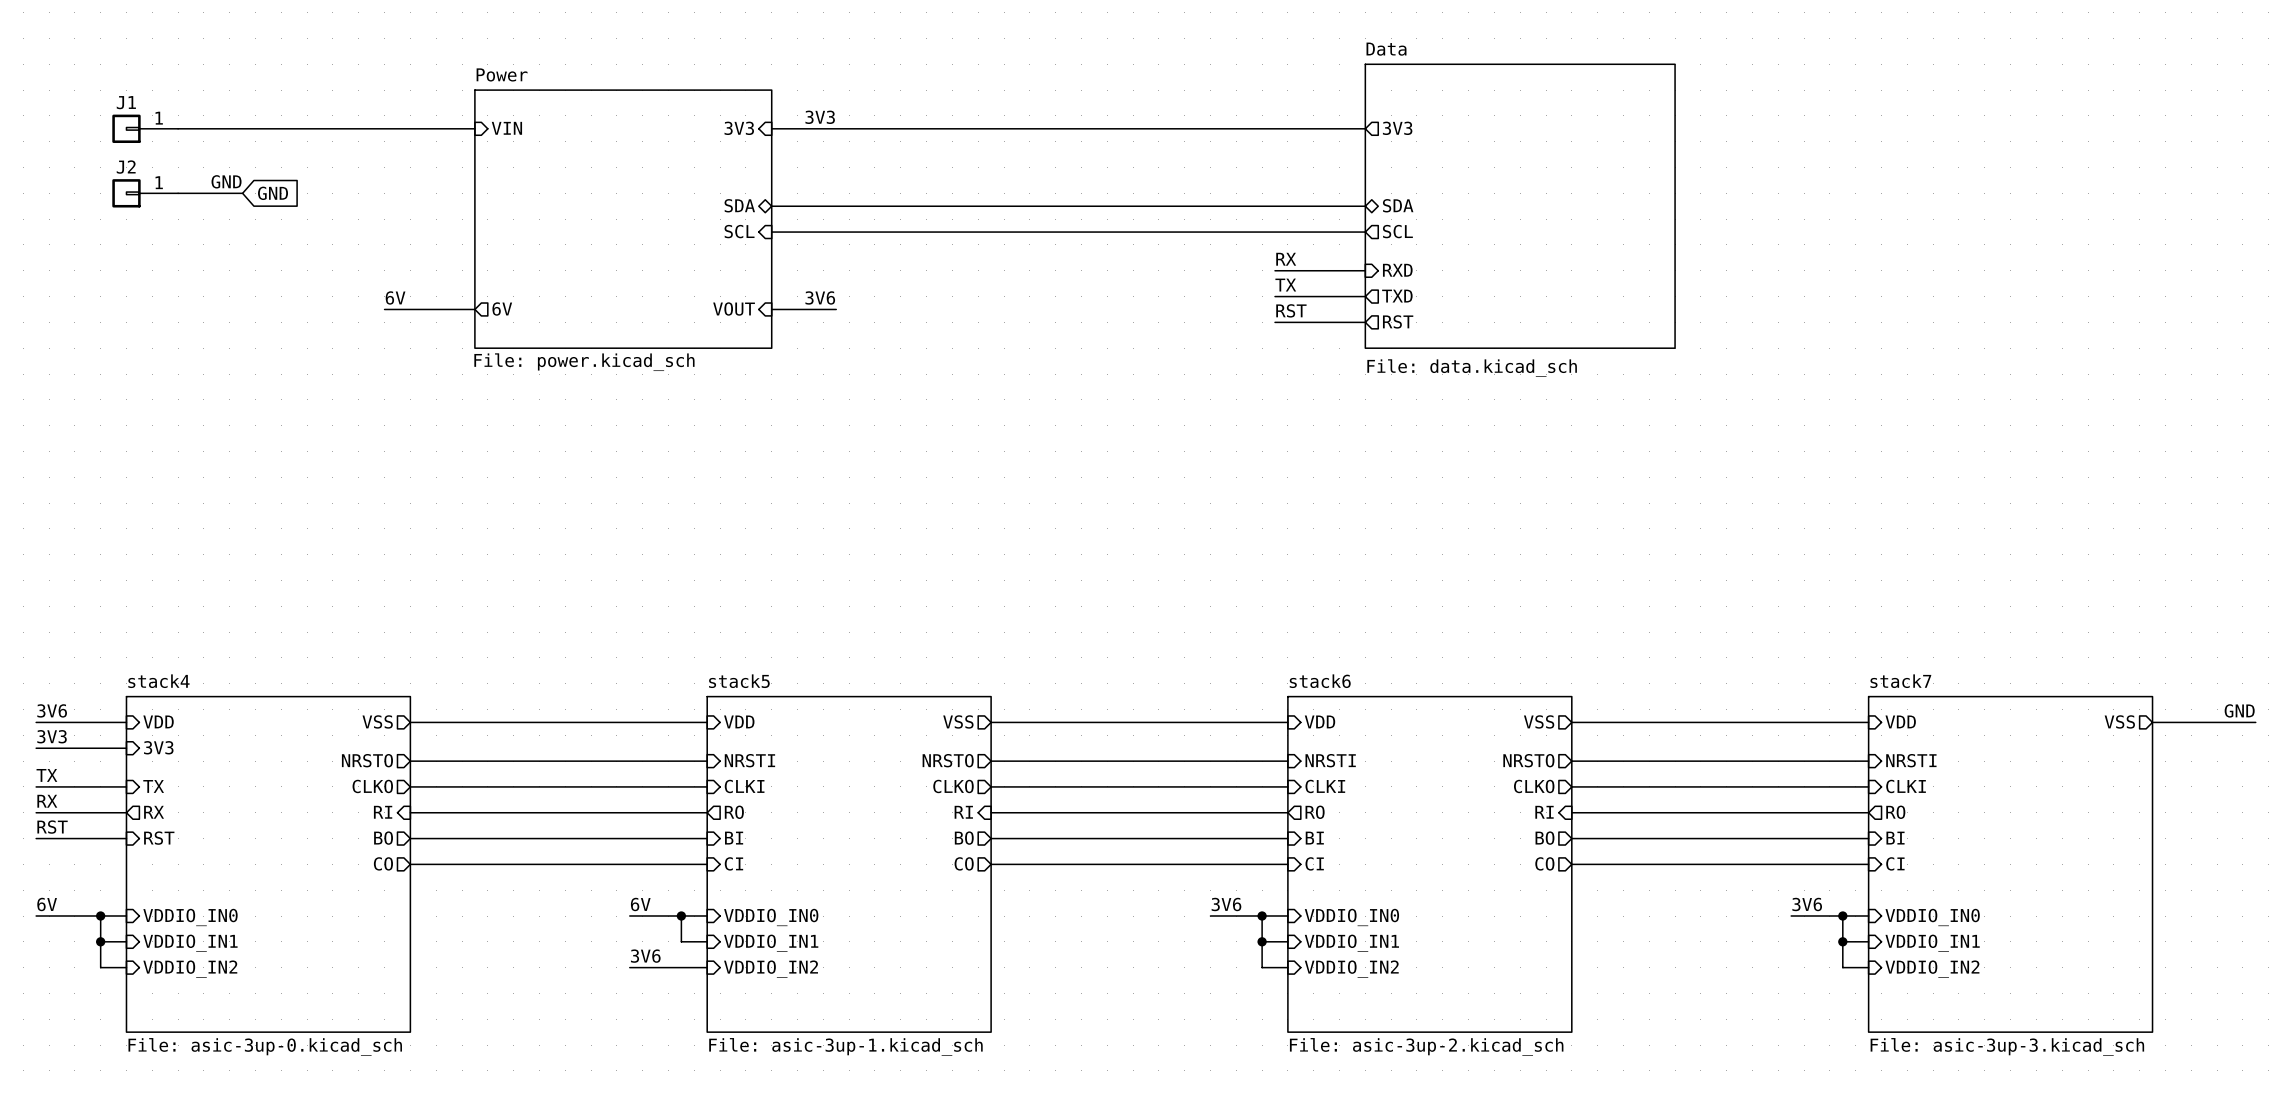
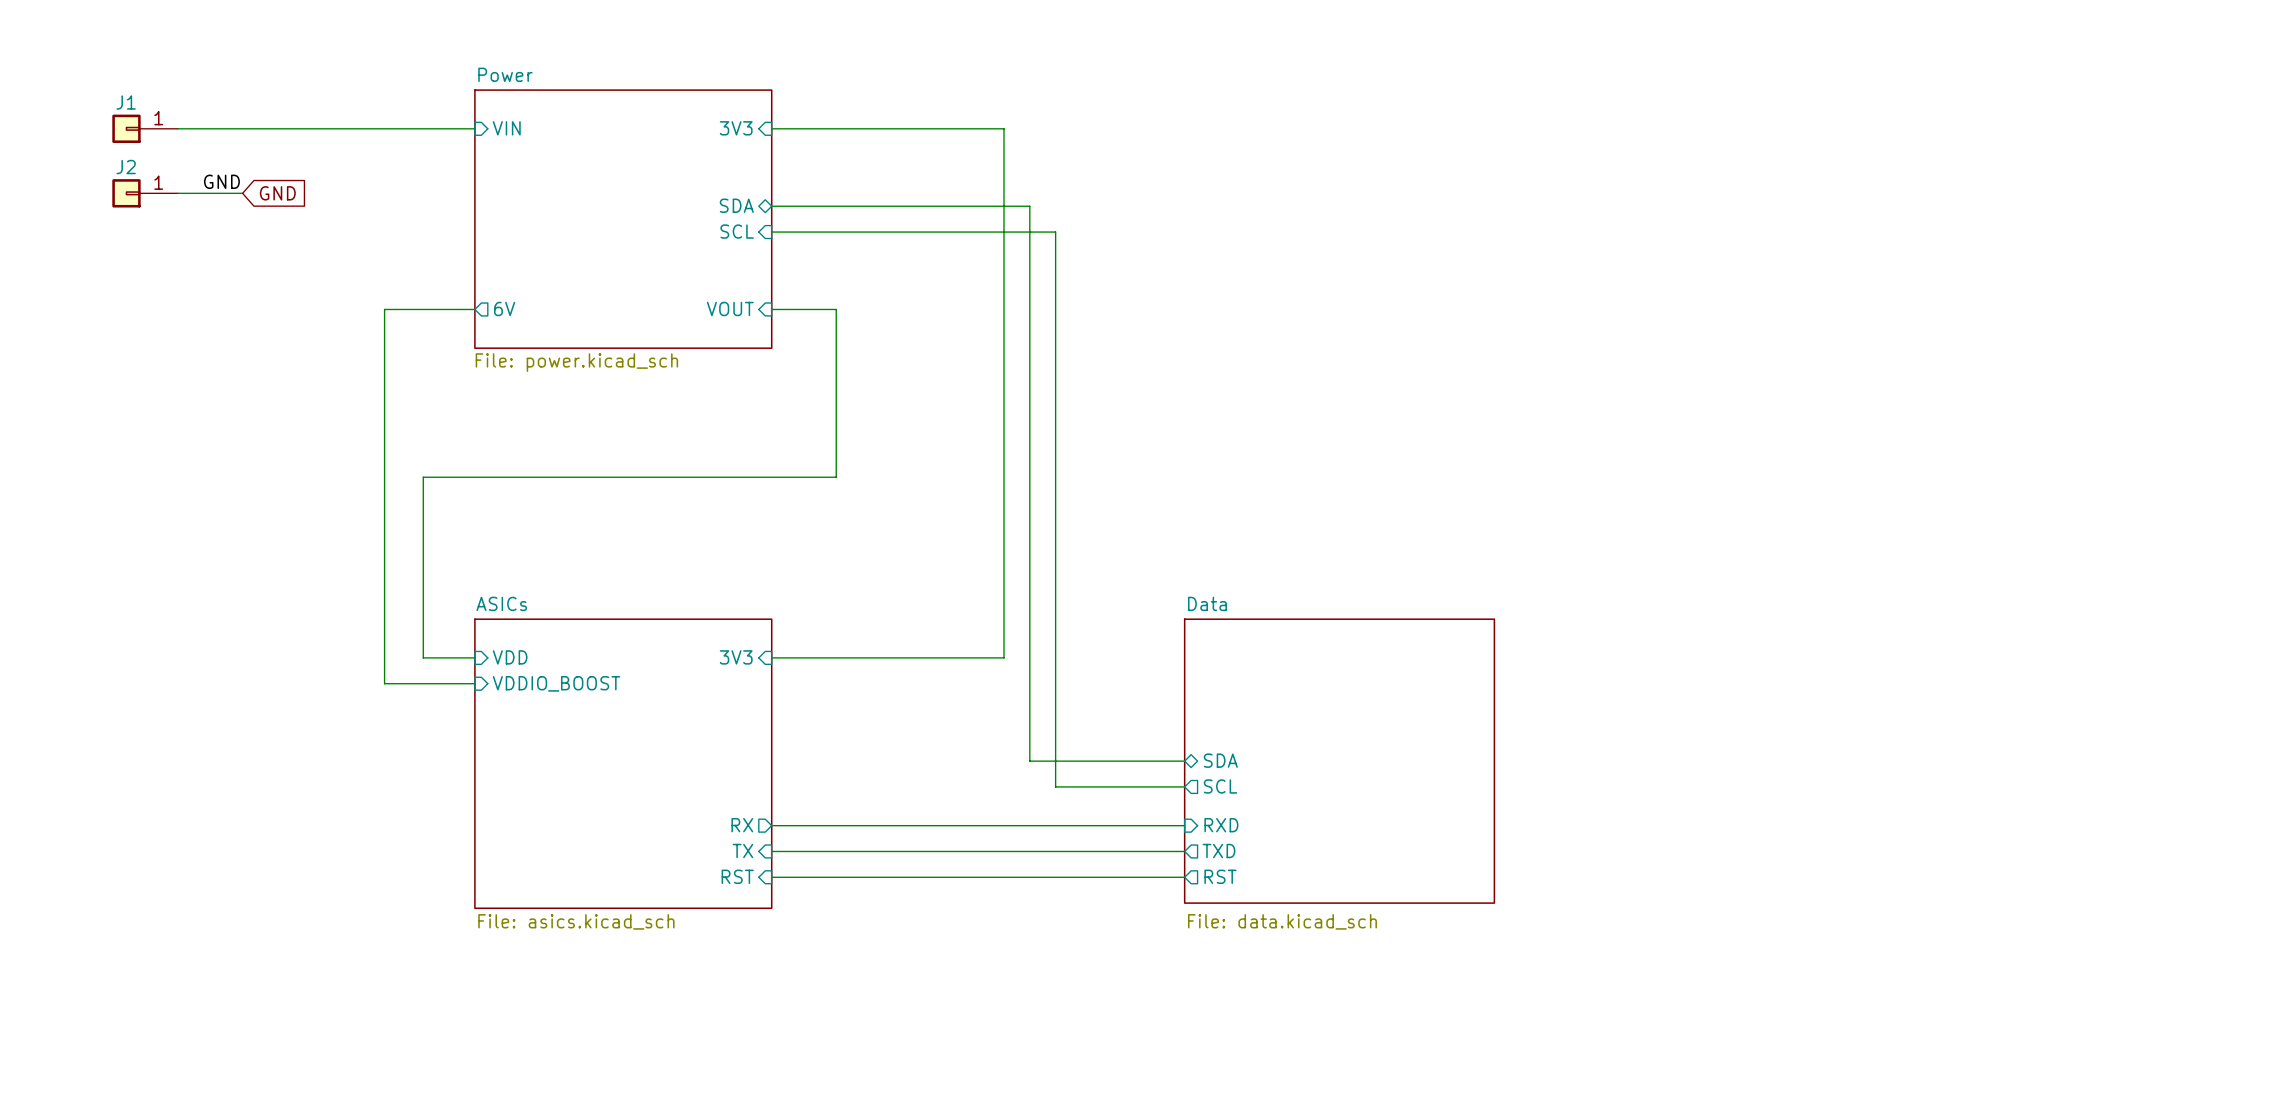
label: 3V3 (820, 117) -> none
wire: (1004, 128) (1365, 128) -> (1004, 128) (1004, 657) (771, 657)
sheet pin: 3V3 (1397, 128) -> none
sheet pin: SDA (1398, 205) -> none
wire: (1029, 206) (1365, 206) -> none
sheet Data: File: data.kicad_sch (1520, 206) -> none
sheet pin: SCL (1397, 231) -> none
wire: (1055, 232) (1365, 232) -> none
label: RX (1286, 259) -> none
wire: (1275, 270) (1365, 270) -> none
sheet pin: RXD (1397, 270) -> none
label: TX (1285, 285) -> none
wire: (1275, 296) (1365, 296) -> none
sheet pin: TXD (1397, 296) -> none
label: 6V (395, 297) -> none
label: 3V6 (820, 297) -> none
wire: none -> (384, 309) (384, 683) (474, 683)
wire: none -> (836, 309) (836, 477) (423, 477) (423, 657) (474, 657)
label: RST (1291, 310) -> none
sheet pin: RST (1398, 321) -> none
wire: (1275, 322) (1365, 322) -> none
sheet pin: none -> VDD (510, 657)
sheet pin: none -> 3V3 (736, 657)
sheet pin: none -> VDDIO_BOOST (556, 683)
label: 3V6 (52, 710) -> none
label: GND (2239, 710) -> none
sheet pin: VDD (158, 721) -> none
sheet pin: VSS (377, 721) -> none
sheet pin: VDD (739, 721) -> none
sheet pin: VSS (958, 721) -> none
sheet pin: VDD (1319, 721) -> none
sheet pin: VSS (1539, 721) -> none
sheet pin: VDD (1900, 721) -> none
sheet pin: VSS (2119, 721) -> none
wire: (36, 722) (126, 722) -> none
wire: (410, 722) (707, 722) -> none
wire: (991, 722) (1287, 722) -> none
wire: (1571, 722) (1868, 722) -> none
wire: (2152, 722) (2255, 722) -> none
label: 3V3 (52, 736) -> none
sheet pin: 3V3 (158, 747) -> none
wire: (36, 748) (126, 748) -> none
sheet pin: NRSTO (367, 760) -> none
sheet pin: NRSTI (749, 760) -> none
sheet pin: NRSTO (948, 760) -> none
sheet pin: none -> SDA (1220, 760)
sheet pin: NRSTI (1330, 760) -> none
sheet pin: NRSTO (1528, 760) -> none
sheet pin: NRSTI (1911, 760) -> none
wire: (410, 761) (707, 761) -> none
wire: (991, 761) (1029, 761) -> (1029, 206) (1029, 761)
wire: (1184, 761) (1287, 761) -> none
sheet Data: none -> File: data.kicad_sch (1339, 761)
wire: (1571, 761) (1868, 761) -> none
sheet ASICs: none -> File: asics.kicad_sch (623, 763)
label: TX (46, 775) -> none
wire: (36, 786) (126, 786) -> none
sheet pin: TX (153, 786) -> none
sheet pin: CLKO (372, 786) -> none
wire: (410, 786) (707, 786) -> none
sheet pin: CLKI (744, 786) -> none
sheet pin: CLKO (953, 786) -> none
wire: (991, 786) (1055, 786) -> (1055, 232) (1055, 786)
wire: (1184, 786) (1287, 786) -> none
sheet pin: none -> SCL (1220, 786)
sheet pin: CLKI (1325, 786) -> none
sheet pin: CLKO (1534, 786) -> none
wire: (1571, 786) (1868, 786) -> none
sheet pin: CLKI (1906, 786) -> none
label: RX (47, 801) -> none
wire: (36, 812) (126, 812) -> none
sheet pin: RX (154, 812) -> none
sheet pin: RI (383, 812) -> none
wire: (410, 812) (707, 812) -> none
sheet pin: RO (734, 812) -> none
sheet pin: RI (963, 812) -> none
wire: (991, 812) (1287, 812) -> none
sheet pin: RO (1315, 812) -> none
sheet pin: RI (1544, 812) -> none
wire: (1571, 812) (1868, 812) -> none
sheet pin: RO (1895, 812) -> none
sheet pin: none -> RX (742, 825)
wire: none -> (771, 825) (1184, 825)
sheet pin: none -> RXD (1221, 825)
label: RST (52, 827) -> none
wire: (36, 838) (126, 838) -> none
sheet pin: RST (159, 838) -> none
sheet pin: BO (383, 838) -> none
wire: (410, 838) (707, 838) -> none
sheet pin: BI (734, 838) -> none
sheet pin: BO (964, 838) -> none
wire: (991, 838) (1287, 838) -> none
sheet pin: BI (1314, 838) -> none
sheet pin: BO (1544, 838) -> none
wire: (1571, 838) (1868, 838) -> none
sheet pin: BI (1895, 838) -> none
sheet pin: none -> TX (742, 850)
sheet pin: none -> TXD (1218, 850)
wire: none -> (771, 851) (1184, 851)
sheet pin: CO (383, 863) -> none
sheet pin: CI (733, 863) -> none
sheet pin: CO (964, 863) -> none
sheet pin: CI (1314, 863) -> none
sheet pin: CO (1544, 863) -> none
sheet pin: CI (1895, 863) -> none
sheet stack4: File: asic-3up-0.kicad_sch (268, 864) -> none
wire: (410, 864) (707, 864) -> none
sheet stack5: File: asic-3up-1.kicad_sch (849, 864) -> none
wire: (991, 864) (1287, 864) -> none
sheet stack6: File: asic-3up-2.kicad_sch (1429, 864) -> none
wire: (1571, 864) (1868, 864) -> none
sheet stack7: File: asic-3up-3.kicad_sch (2010, 864) -> none
sheet pin: none -> RST (737, 876)
sheet pin: none -> RST (1220, 876)
wire: none -> (771, 877) (1184, 877)
label: 6V (47, 904) -> none
label: 6V (640, 904) -> none
label: 3V6 (1226, 904) -> none
label: 3V6 (1807, 904) -> none
wire: (36, 916) (126, 916) -> none
wire: (100, 916) (100, 967) (126, 967) -> none
junction: (100, 916) -> none
wire: (629, 916) (707, 916) -> none
wire: (681, 916) (681, 941) (707, 941) -> none
junction: (681, 916) -> none
wire: (1210, 916) (1287, 916) -> none
wire: (1262, 916) (1262, 967) (1287, 967) -> none
junction: (1262, 916) -> none
wire: (1791, 916) (1868, 916) -> none
wire: (1842, 916) (1842, 967) (1868, 967) -> none
junction: (1842, 916) -> none
sheet pin: VDDIO_IN0 (190, 917) -> none
sheet pin: VDDIO_IN0 (771, 917) -> none
sheet pin: VDDIO_IN0 (1351, 917) -> none
sheet pin: VDDIO_IN0 (1932, 917) -> none
wire: (100, 941) (126, 941) -> none
junction: (100, 941) -> none
wire: (1262, 941) (1287, 941) -> none
junction: (1262, 941) -> none
wire: (1842, 941) (1868, 941) -> none
junction: (1842, 941) -> none
sheet pin: VDDIO_IN1 (190, 943) -> none
sheet pin: VDDIO_IN1 (771, 943) -> none
sheet pin: VDDIO_IN1 (1351, 943) -> none
sheet pin: VDDIO_IN1 (1932, 943) -> none
label: 3V6 (645, 956) -> none
wire: (629, 967) (707, 967) -> none
sheet pin: VDDIO_IN2 (190, 969) -> none
sheet pin: VDDIO_IN2 (771, 969) -> none
sheet pin: VDDIO_IN2 (1351, 969) -> none
sheet pin: VDDIO_IN2 (1932, 969) -> none

